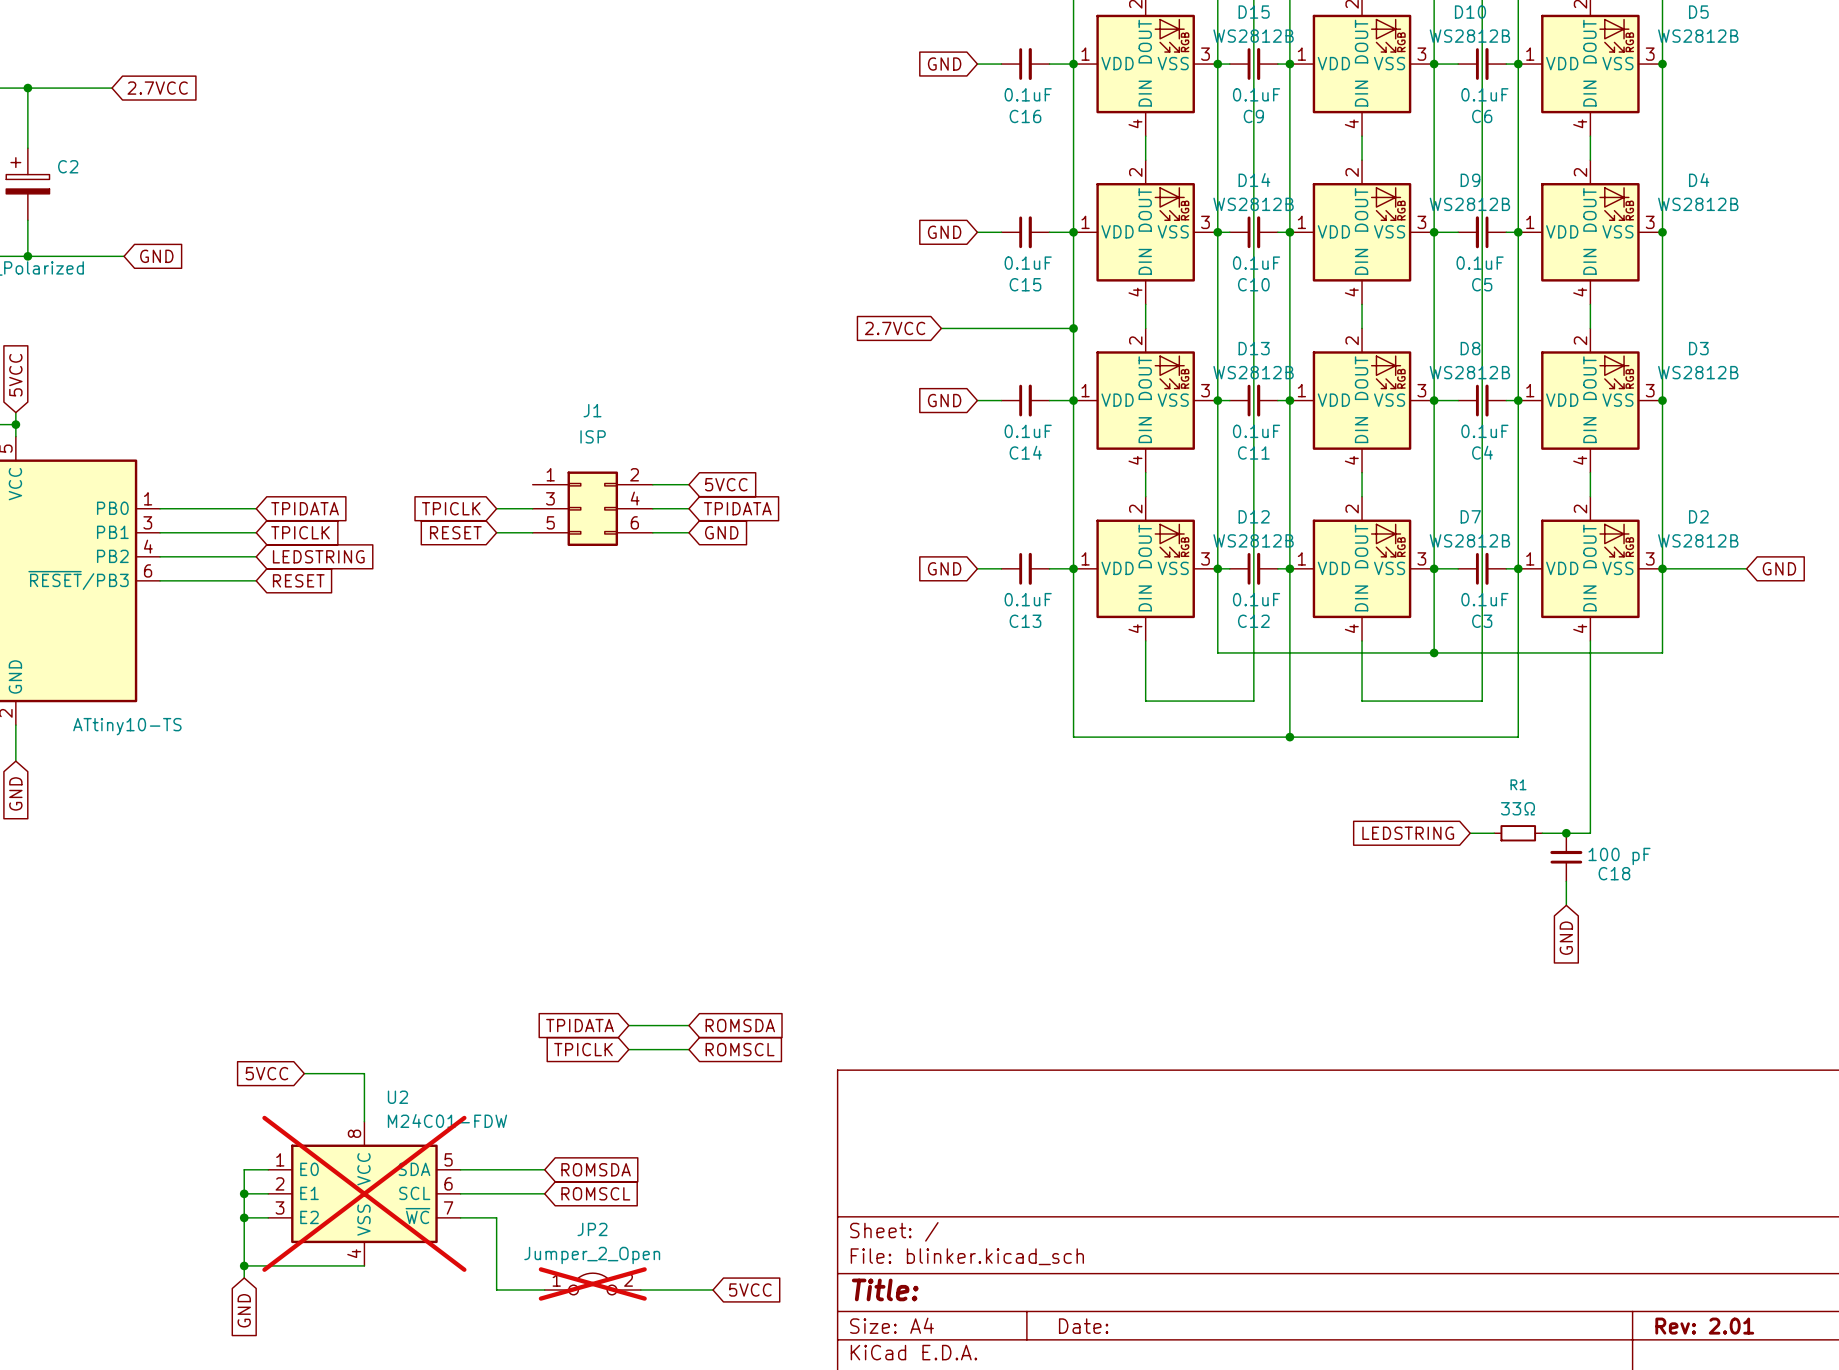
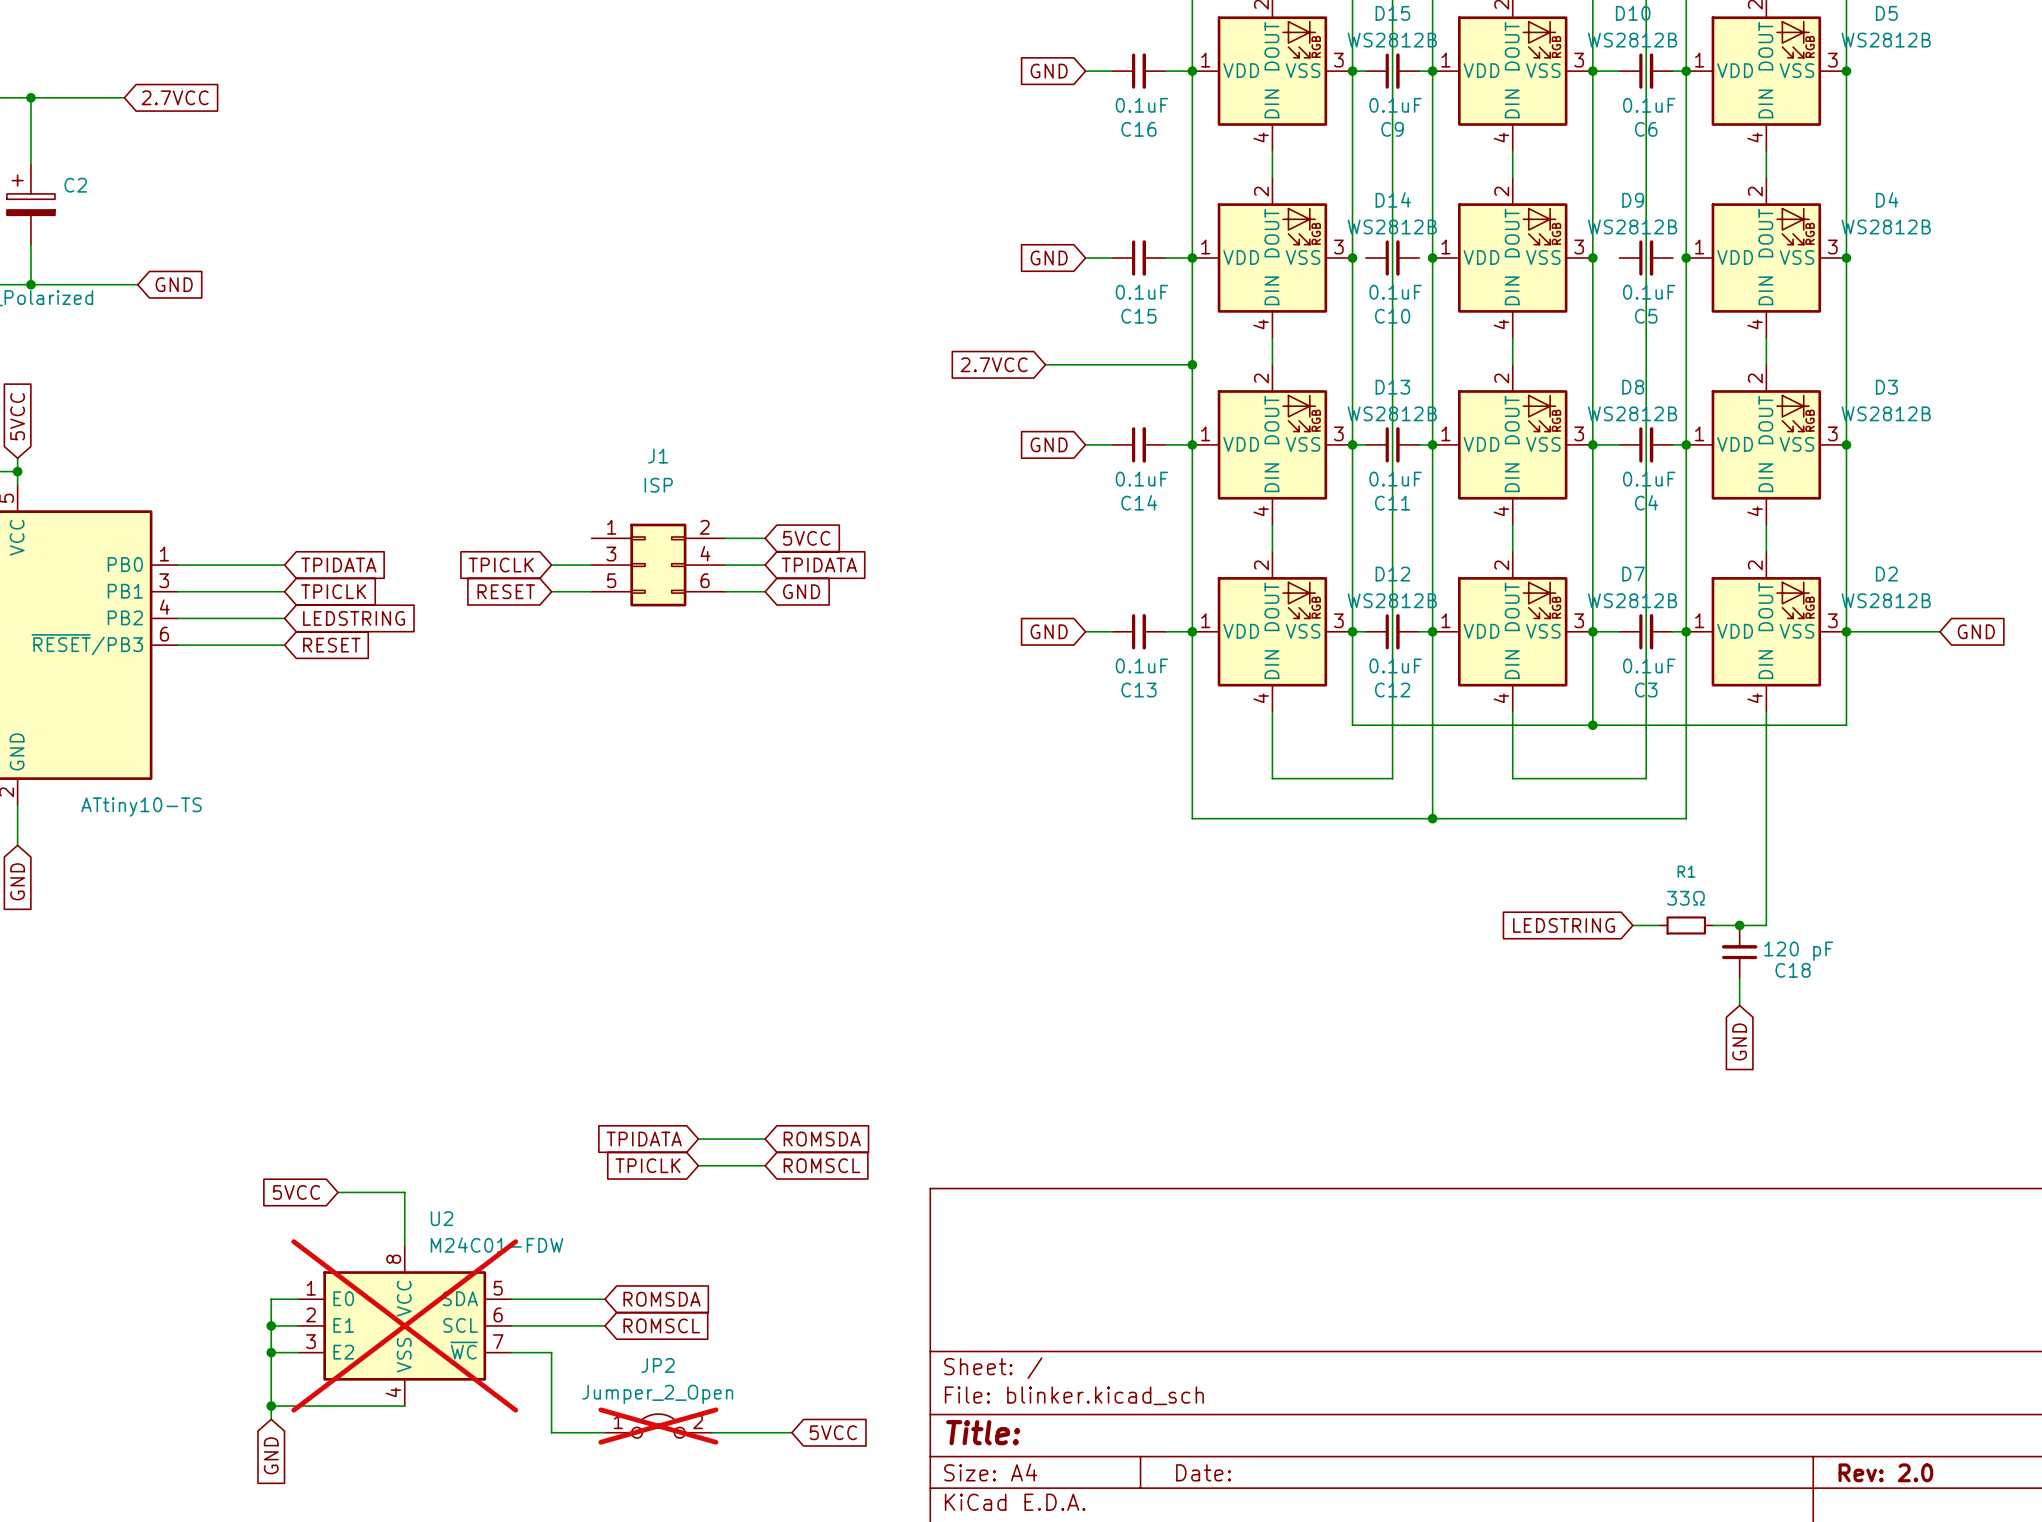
wire: (1217, 232) (1229, 232) -> none
wire: (1277, 232) (1289, 232) -> none
wire: (1434, 232) (1458, 232) -> none
C5 rotation: 0° (1482, 232) -> 180° (1646, 258)
wire: (1506, 232) (1518, 232) -> none
C18 value: 100 pF (1619, 856) -> 120 pF (1798, 951)
title block: Rev: 2.01 (1704, 1326) -> Rev: 2.0 (1885, 1472)

